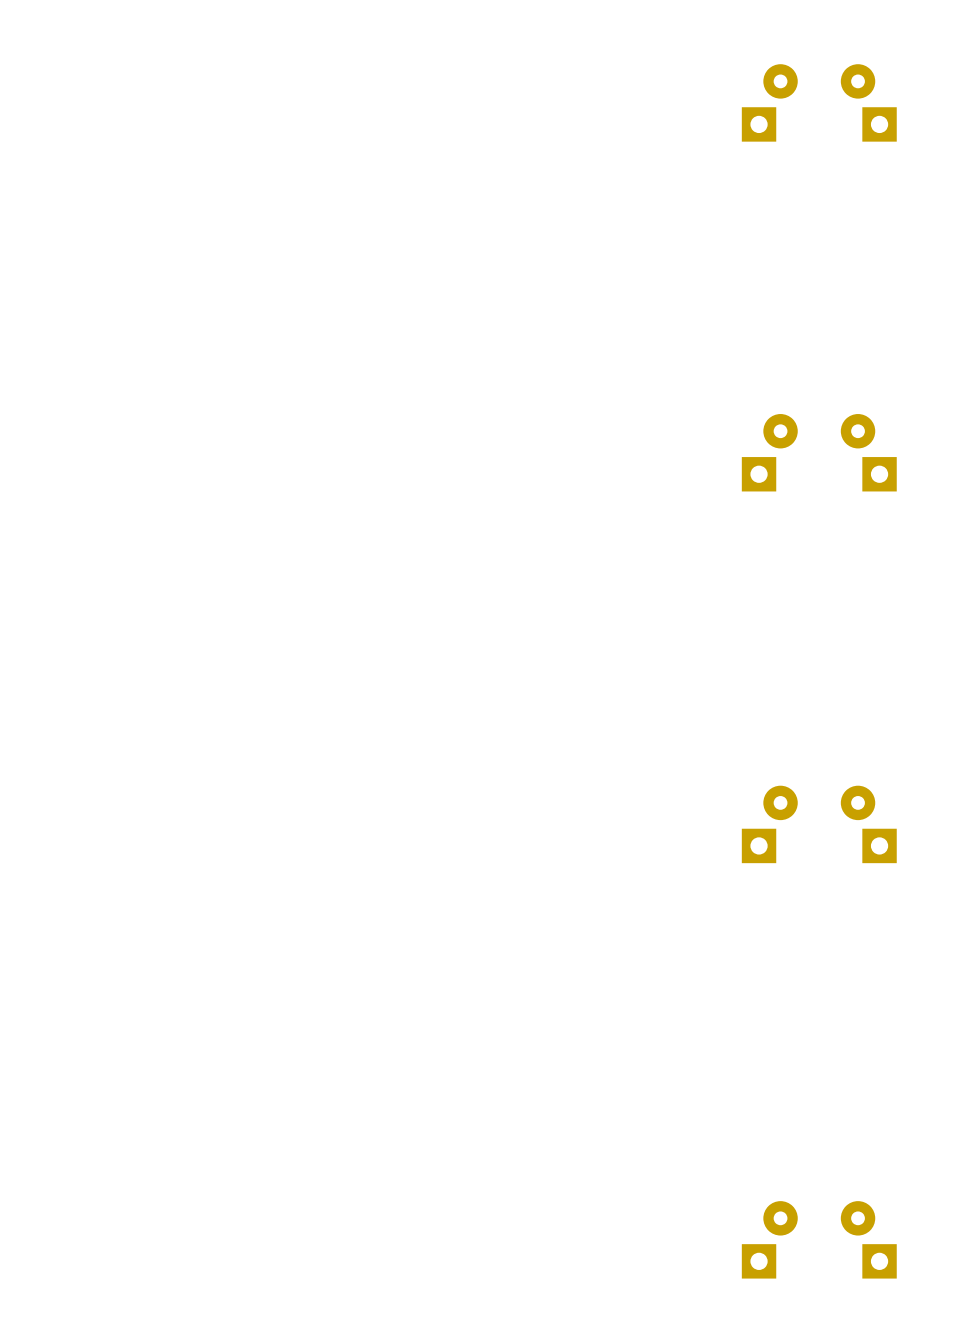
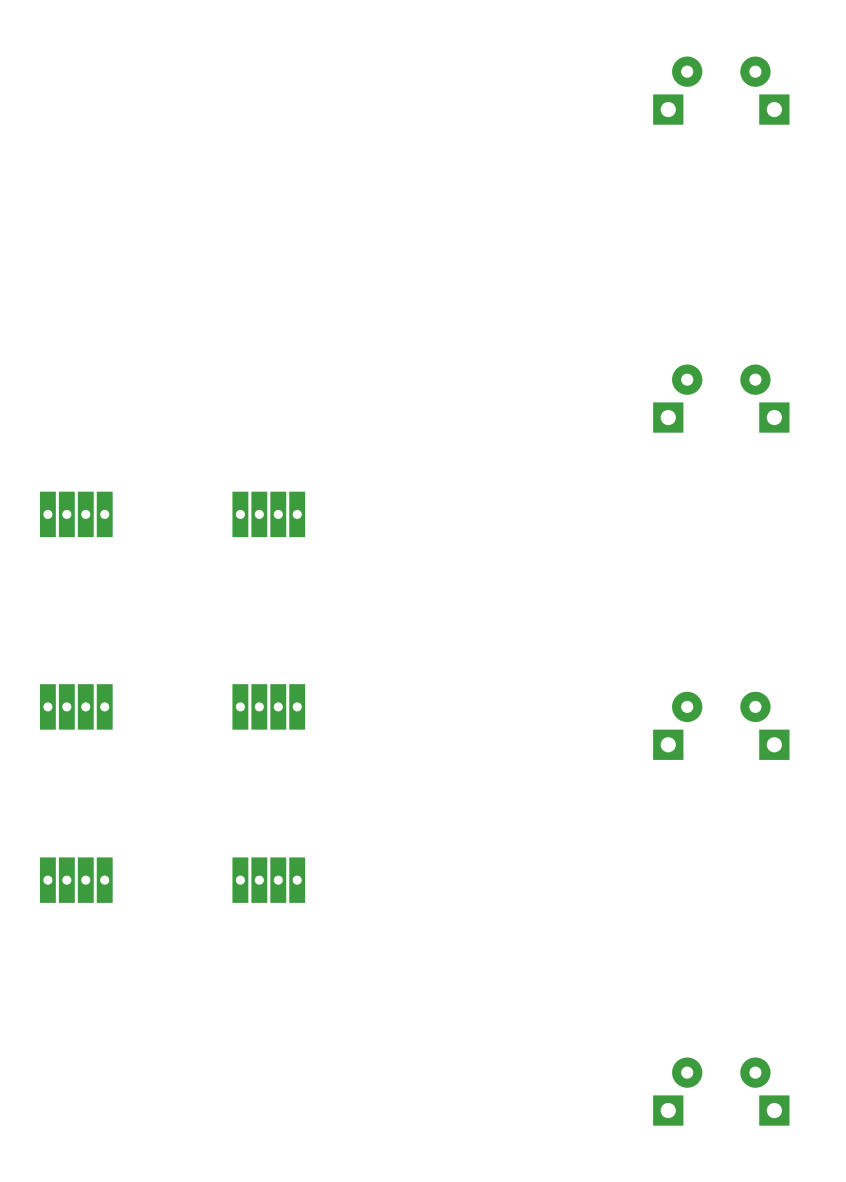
part: none -> (76, 514)
part: none -> (268, 514)
part: none -> (76, 706)
part: none -> (268, 706)
part: none -> (76, 880)
part: none -> (268, 880)

